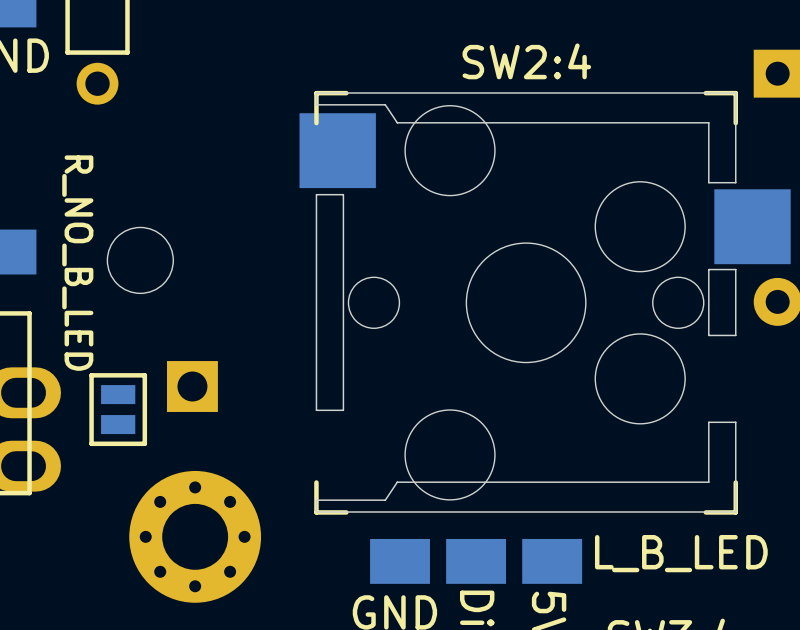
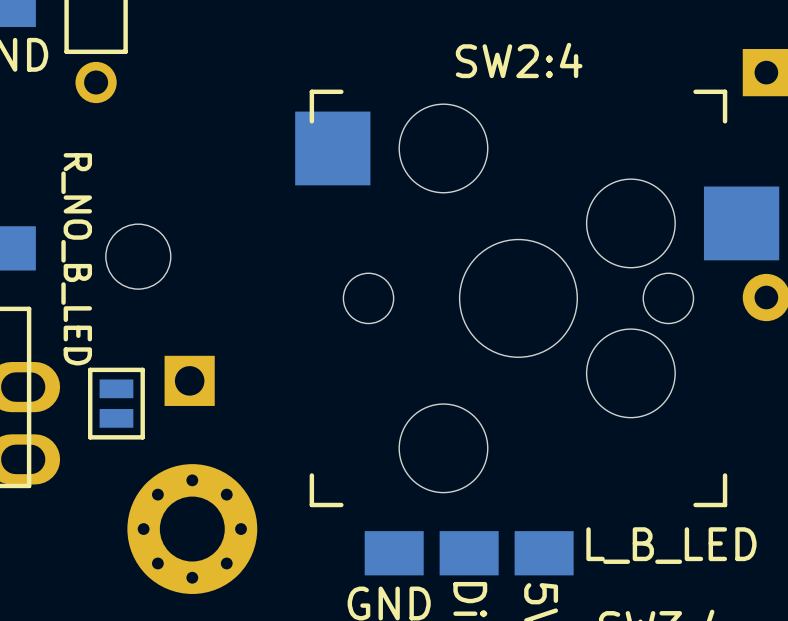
board edge: (735, 93) (316, 93) (316, 104) (385, 104) (397, 122) (708, 122) (708, 182) (735, 182) (735, 93) -> none
board edge: (343, 194) (316, 194) (316, 410) (343, 410) (343, 194) -> none
board edge: (735, 269) (708, 269) (708, 335) (735, 335) (735, 269) -> none
board edge: (735, 422) (735, 512) (316, 512) (316, 500) (385, 500) (397, 482) (708, 482) (708, 422) (735, 422) -> none

